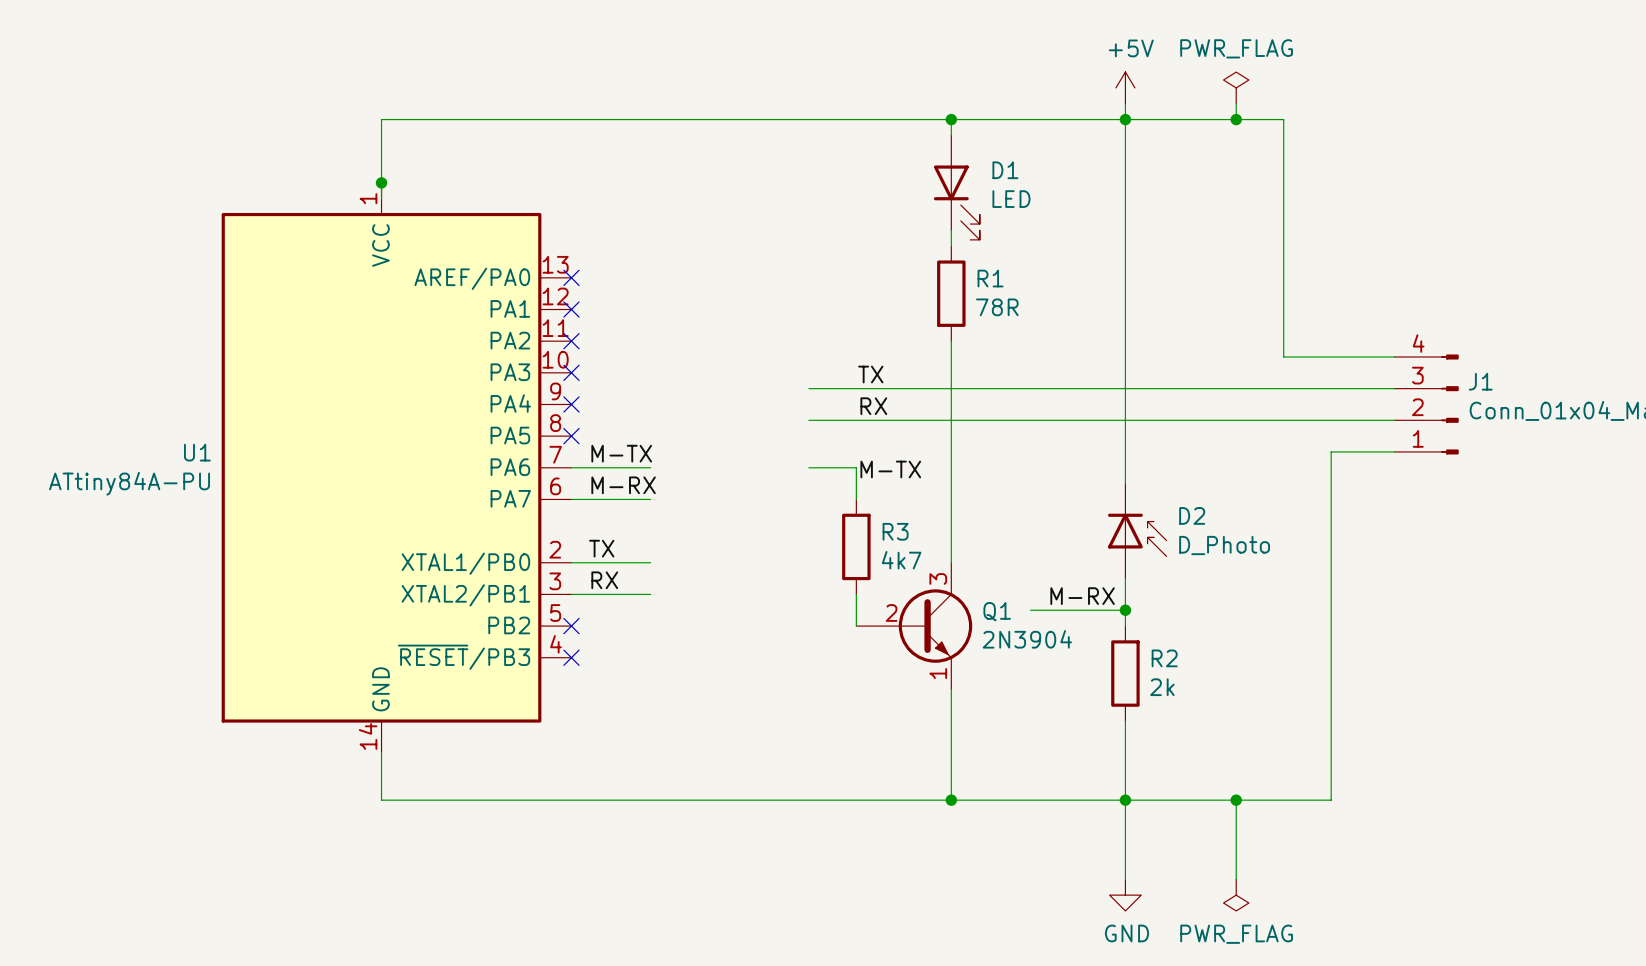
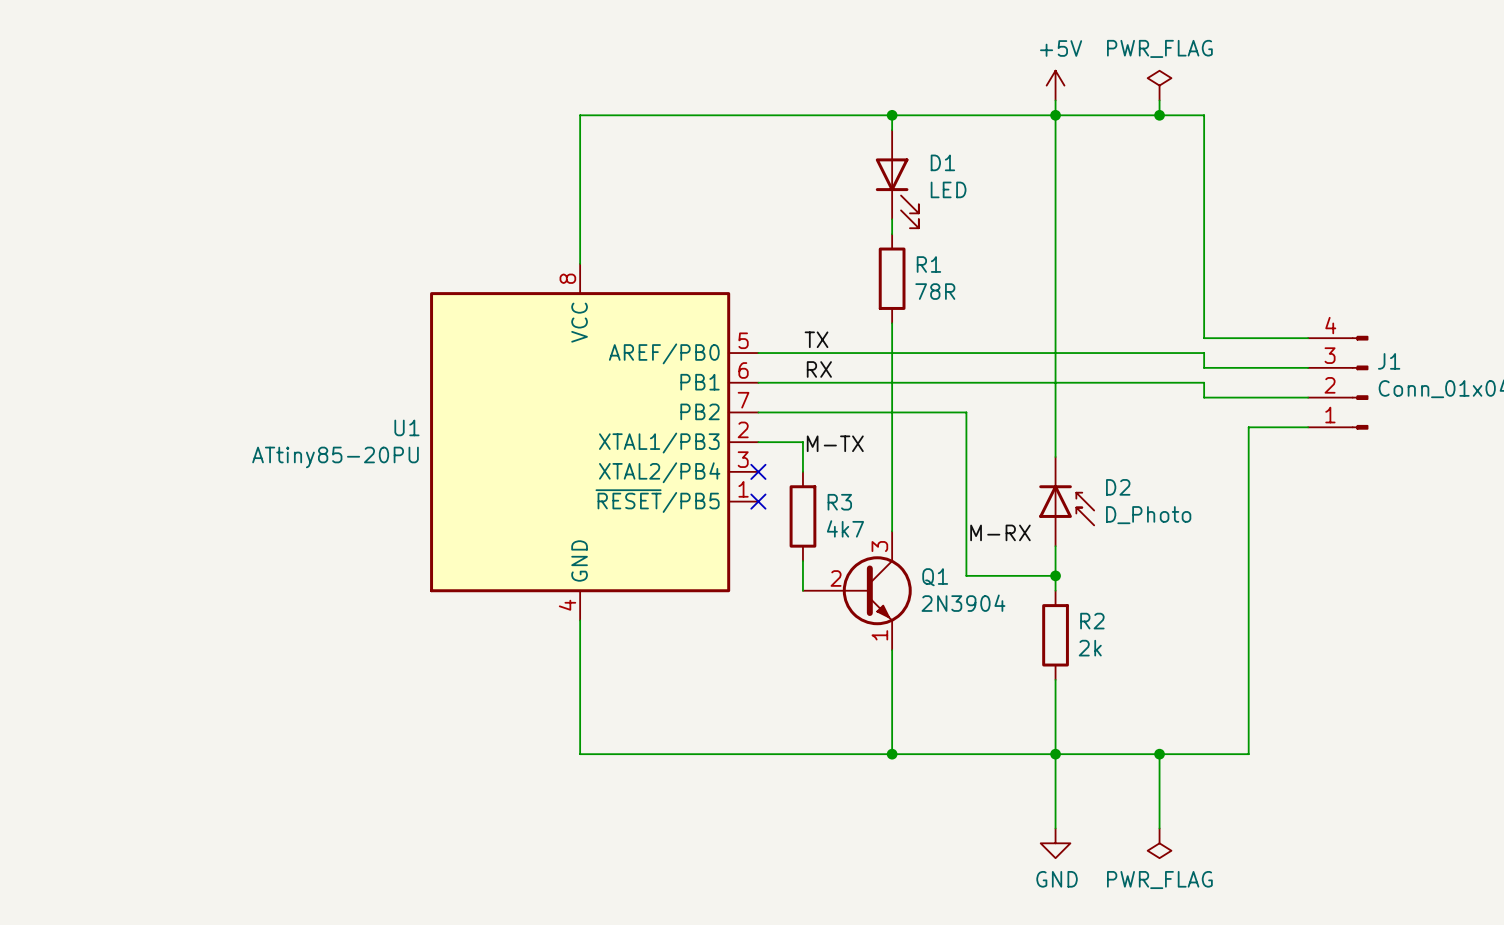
wire: (618, 119) (381, 119) (381, 198) -> (580, 115) (580, 263)
U1 symbol: [221, 182, 572, 753] -> [430, 263, 759, 621]
junction: (381, 182) -> none
no-connect mark: (571, 277) -> none
no-connect mark: (571, 309) -> none
no-connect mark: (571, 341) -> none
no-connect mark: (571, 372) -> none
label position: TX (870, 374) -> TX (816, 339)
wire: (808, 388) (1283, 388) -> (758, 353) (1204, 353) (1204, 367)
no-connect mark: (571, 404) -> none
label position: RX (873, 406) -> RX (819, 369)
wire: (808, 420) (1283, 420) -> (758, 382) (1204, 382) (1204, 397)
no-connect mark: (571, 436) -> none
wire: none -> (758, 412) (966, 412) (966, 575)
label: M-TX (621, 453) -> none
U1 value: ATtiny84A-PU (129, 483) -> ATtiny85-20PU (335, 457)
label: M-RX (623, 485) -> none
no-connect mark: none -> (758, 471)
no-connect mark: none -> (758, 501)
label: TX (601, 548) -> none
label: RX (604, 580) -> none
label position: M-RX (1082, 596) -> M-RX (1000, 532)
no-connect mark: (571, 626) -> none
no-connect mark: (571, 657) -> none
wire: (381, 752) (381, 800) (618, 800) -> (580, 620) (580, 754)

